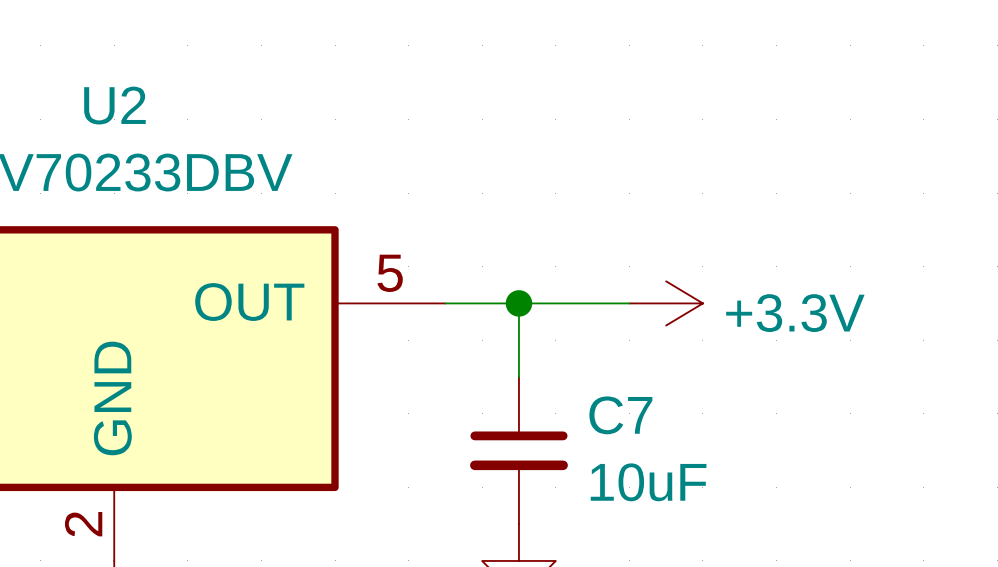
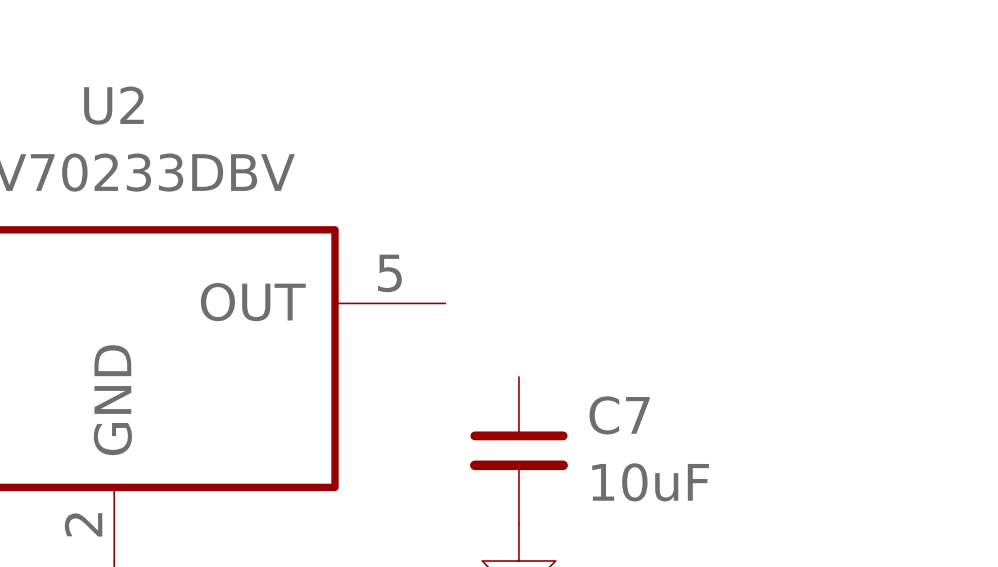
wire: (445, 303) (629, 303) -> none
wire: (518, 303) (518, 377) -> none
junction: (518, 303) -> none
power symbol: +3.3V (666, 303) -> none

